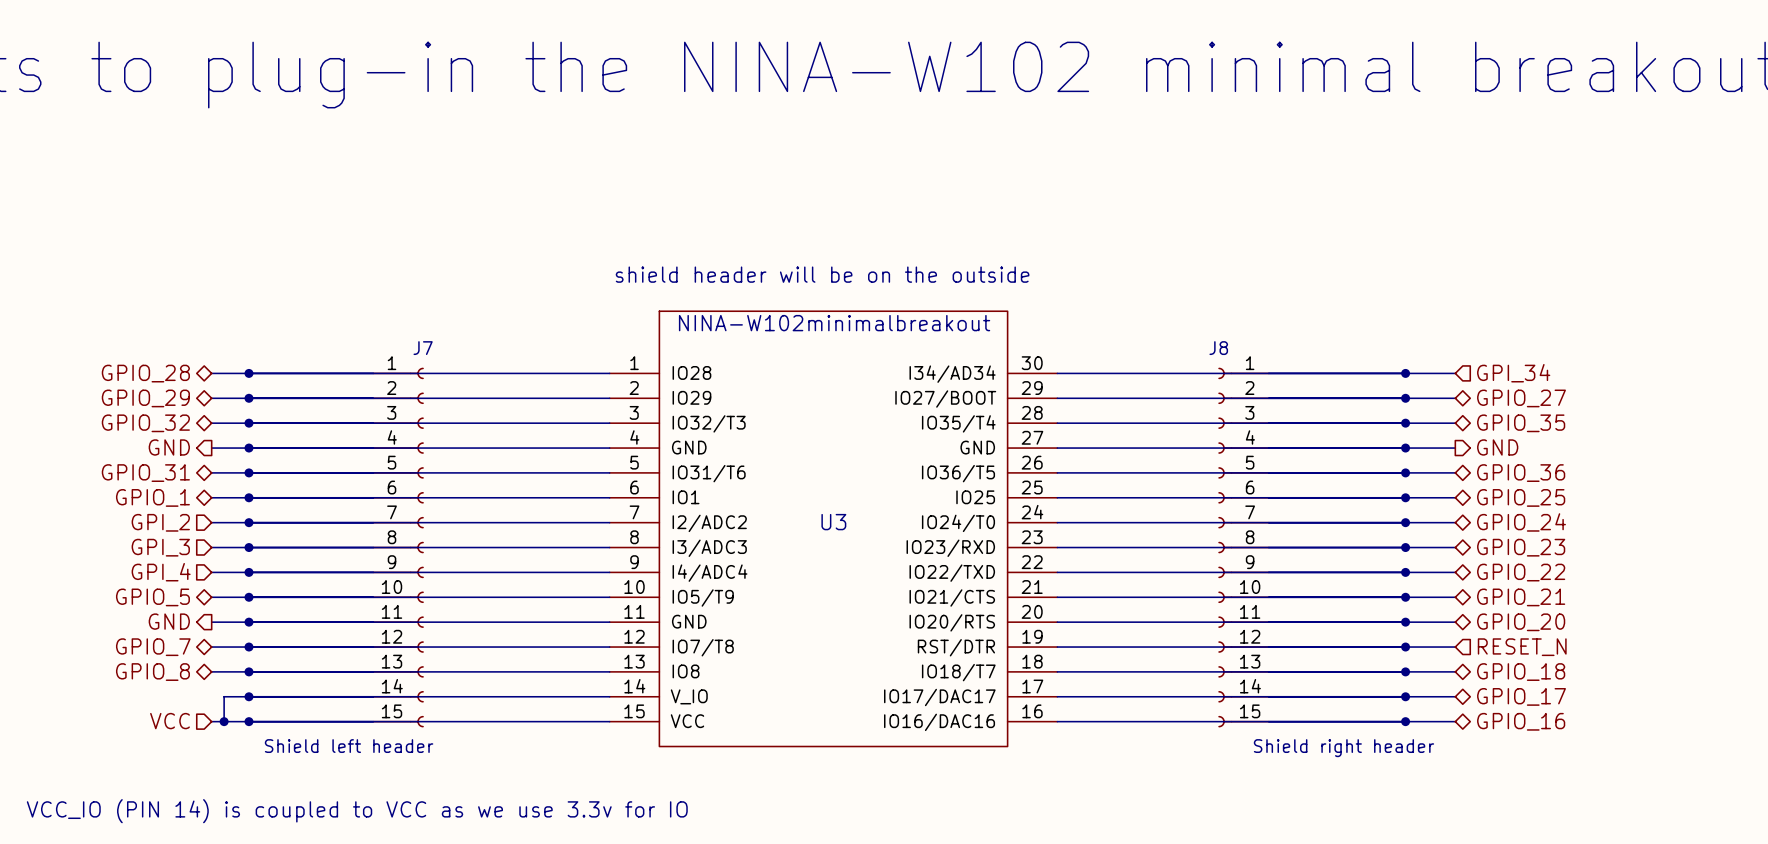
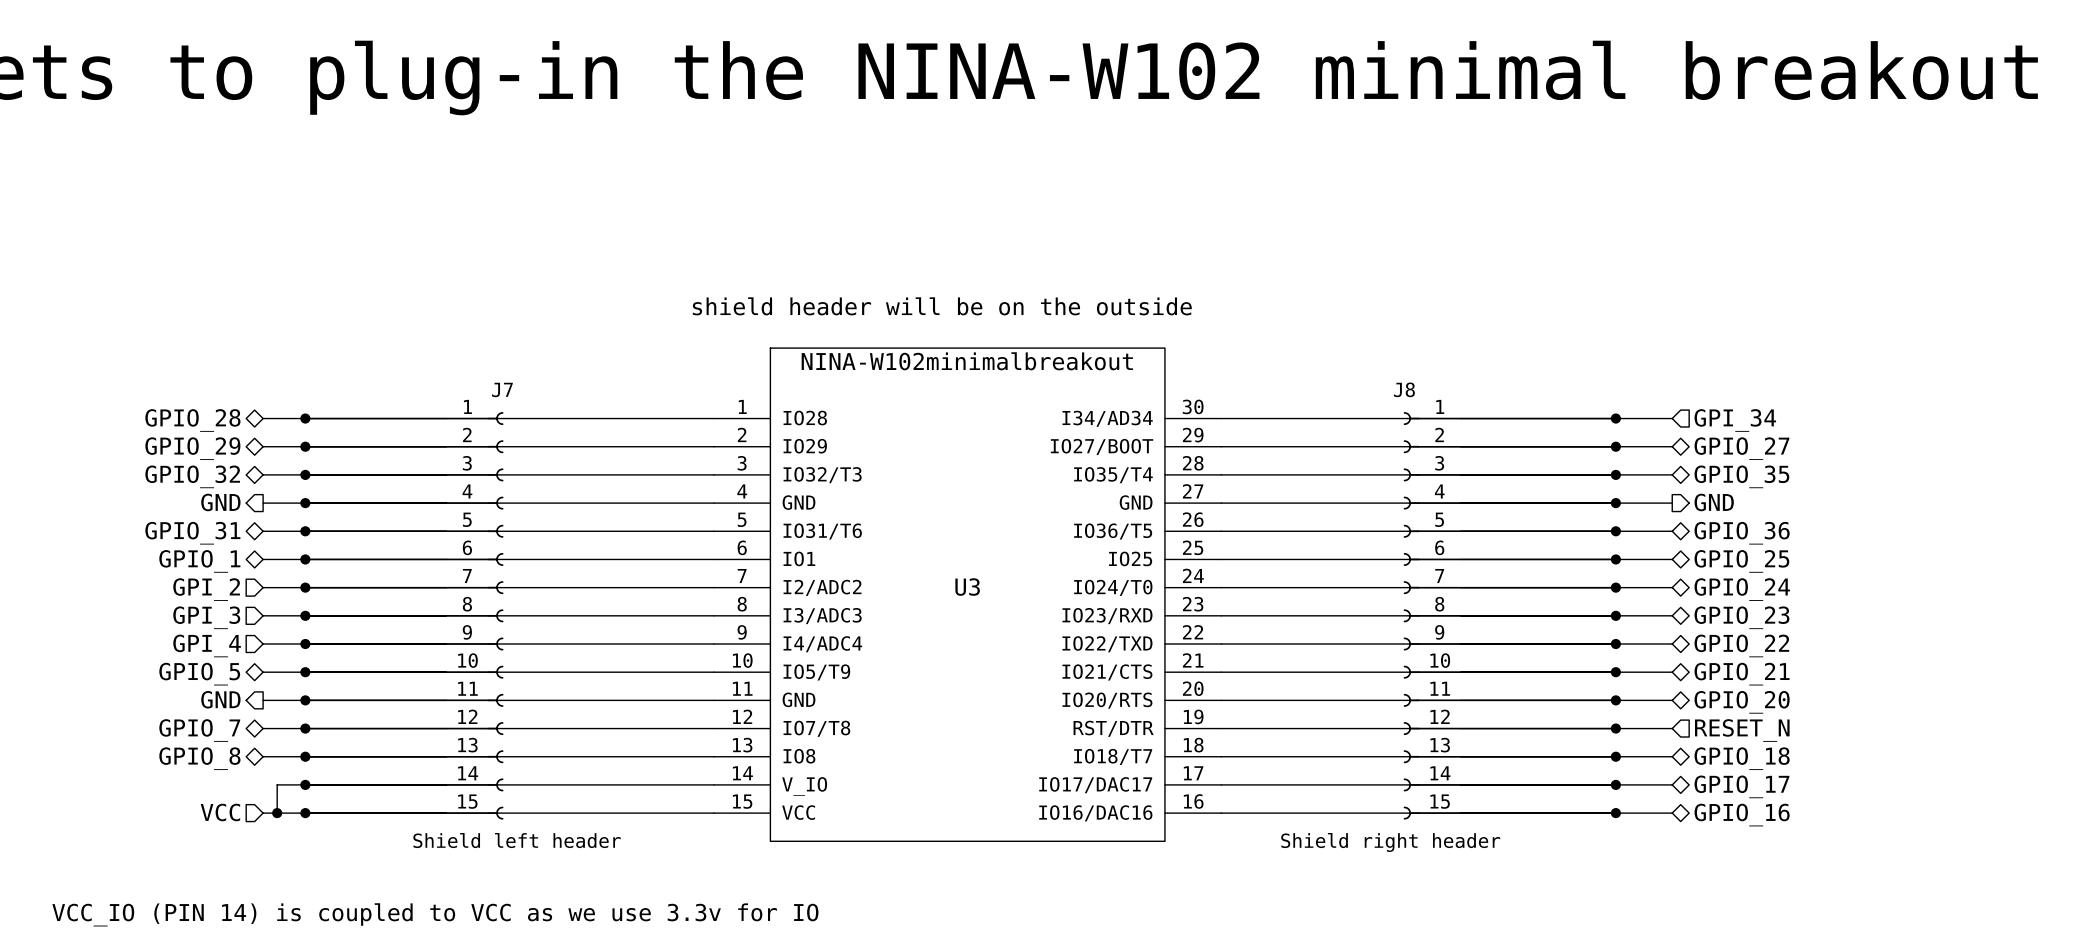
J7 value position: Shield left header (349, 746) -> Shield left header (517, 840)
J8 value position: Shield right header (1343, 748) -> Shield right header (1390, 842)

